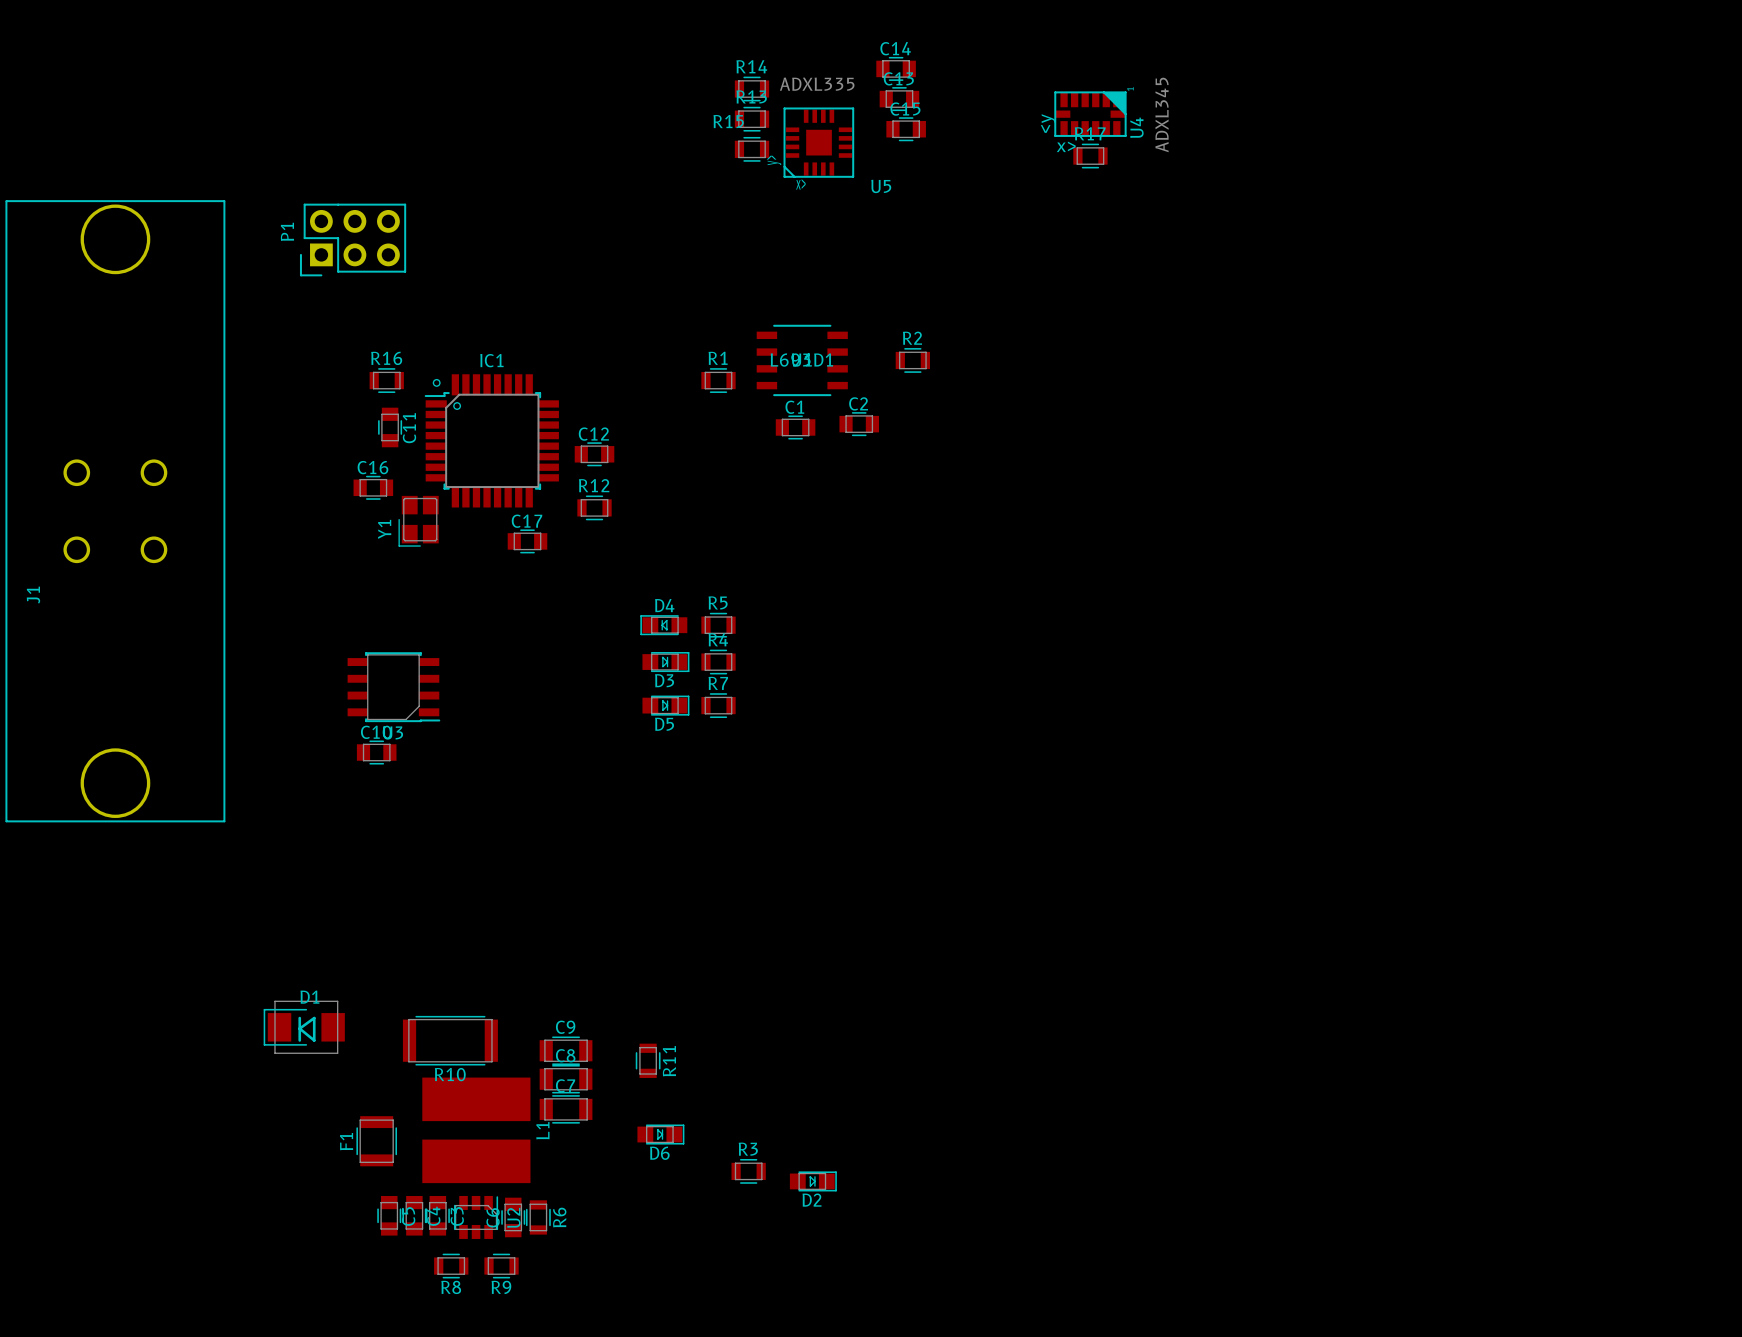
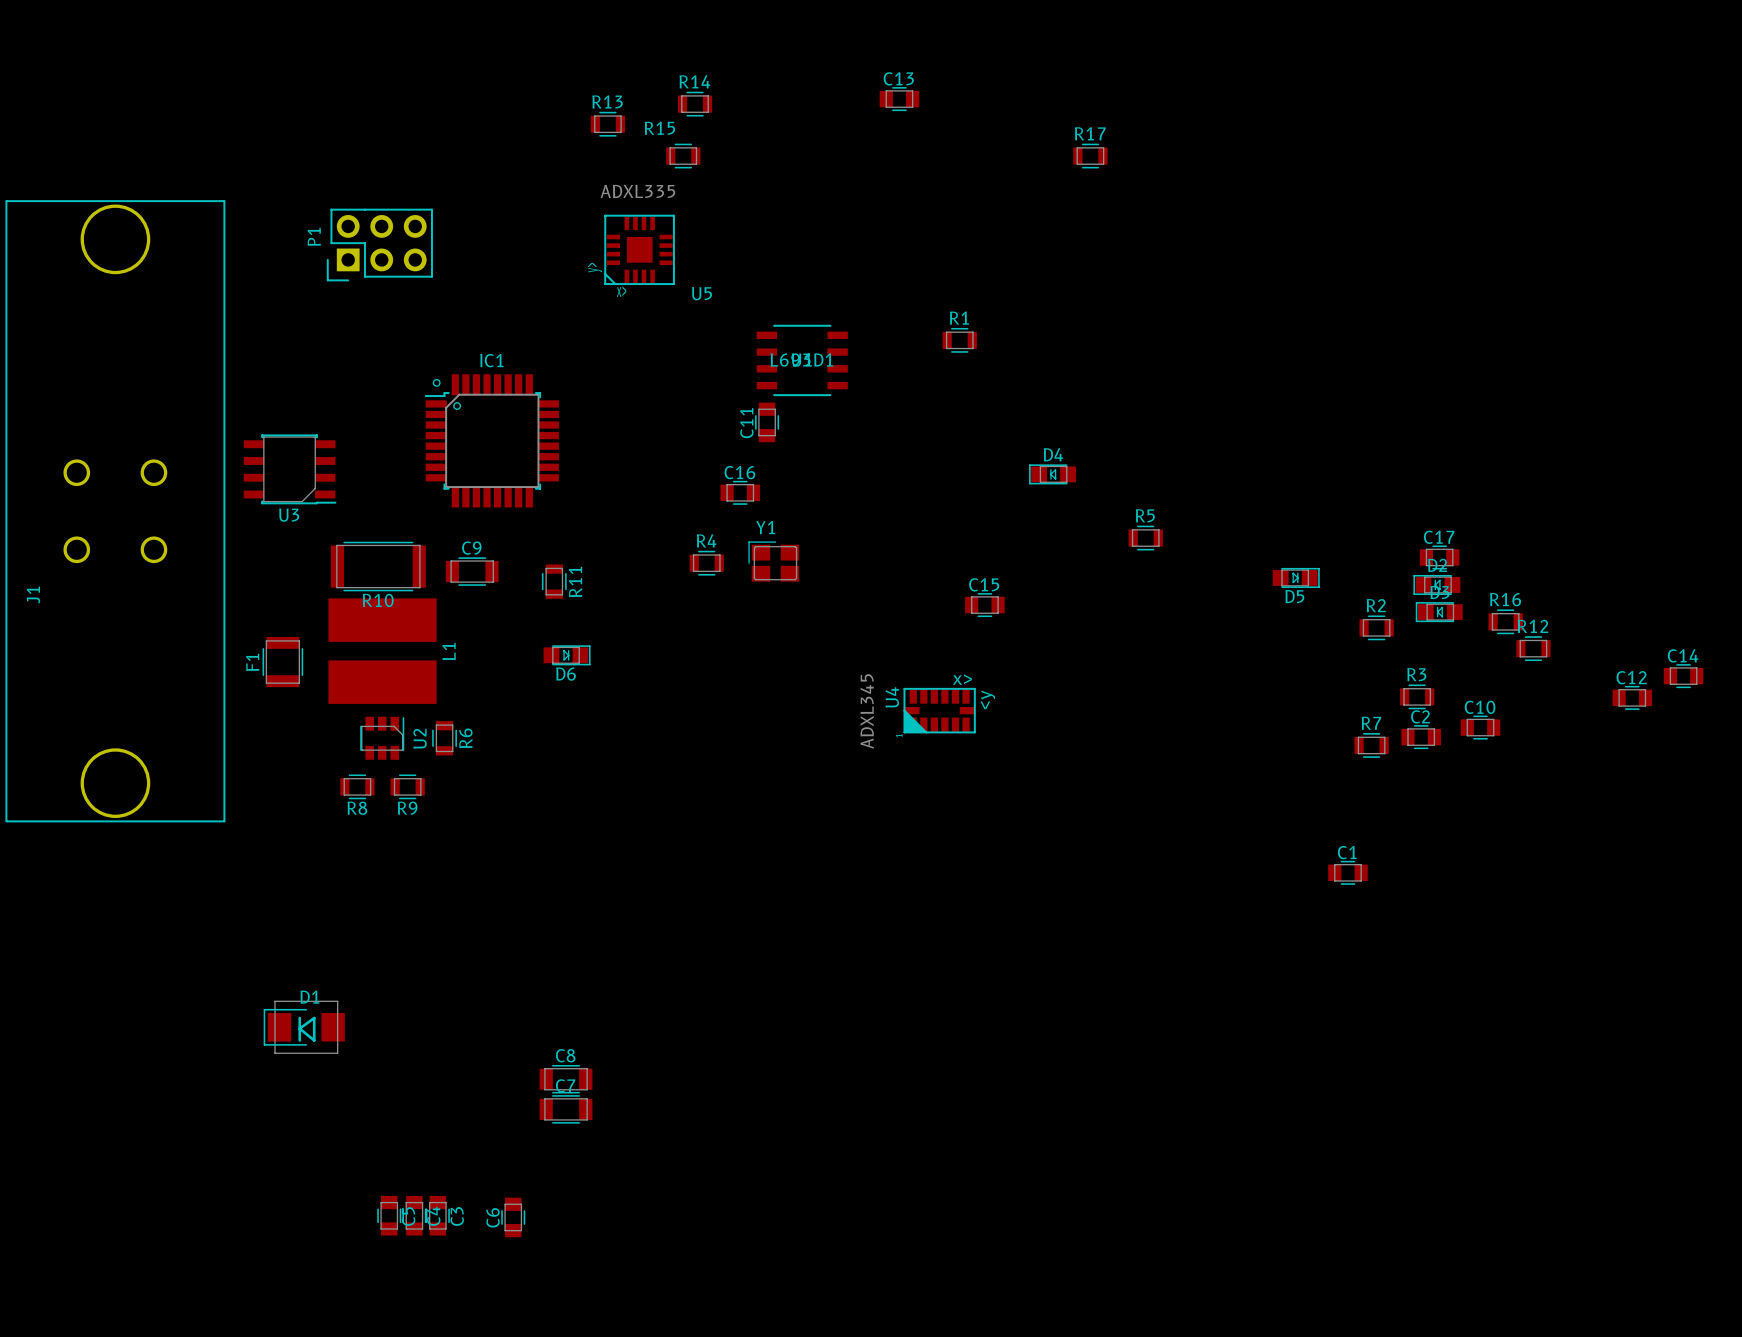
C14 position: (896, 68) -> (1683, 676)
R14 position: (752, 89) -> (695, 104)
U4 rotation: 0° (1090, 114) -> 180° (939, 710)
U4 position: (1090, 114) -> (939, 710)
R13 position: (752, 119) -> (607, 124)
C15 position: (906, 129) -> (984, 605)
U5 position: (818, 142) -> (639, 249)
R15 position: (752, 149) -> (683, 156)
P1 position: (353, 239) -> (379, 245)
R2 position: (912, 360) -> (1376, 627)
R16 position: (386, 380) -> (1505, 621)
R1 position: (718, 380) -> (959, 340)
C2 position: (859, 424) -> (1421, 737)
C11 position: (390, 427) -> (767, 422)
C1 position: (795, 427) -> (1347, 872)
C11 name position: C11 (409, 428) -> C11 (746, 423)
C12 position: (594, 454) -> (1632, 697)
C16 position: (373, 487) -> (740, 492)
R12 position: (594, 507) -> (1533, 648)
Y1 rotation: 0° (418, 521) -> 90° clockwise (773, 561)
Y1 position: (418, 521) -> (773, 561)
C17 position: (527, 541) -> (1439, 557)
D4 position: (663, 625) -> (1052, 474)
R5 position: (718, 625) -> (1145, 538)
D3 rotation: 0° (665, 662) -> 180° (1439, 612)
D3 position: (665, 662) -> (1439, 612)
R4 position: (718, 662) -> (706, 563)
U3 position: (393, 687) -> (290, 469)
D5 position: (665, 705) -> (1296, 577)
R7 position: (718, 705) -> (1371, 745)
C10 position: (376, 752) -> (1480, 727)
R10 position: (450, 1040) -> (378, 566)
C9 position: (566, 1050) -> (472, 571)
R11 position: (648, 1060) -> (554, 581)
L1 position: (476, 1130) -> (382, 651)
D6 position: (660, 1134) -> (567, 655)
F1 position: (376, 1141) -> (282, 662)
R3 position: (748, 1171) -> (1417, 696)
D2 rotation: 0° (813, 1181) -> 180° (1436, 584)
D2 position: (813, 1181) -> (1436, 584)
U2 position: (476, 1217) -> (382, 738)
R6 position: (538, 1217) -> (444, 738)
R8 position: (451, 1266) -> (357, 786)
R9 position: (501, 1266) -> (407, 786)

